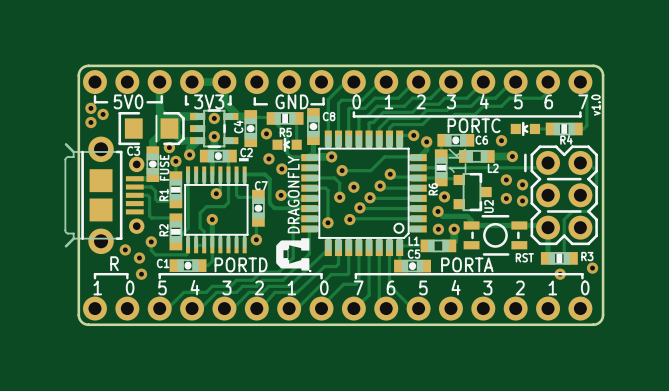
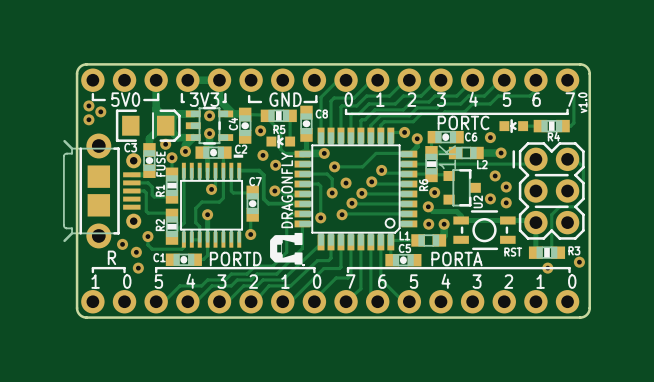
via: (522, 184) -> none
via: none -> (506, 187)
via: (506, 198) -> none
via: (522, 200) -> none
via: none -> (490, 198)
via: none -> (506, 202)

